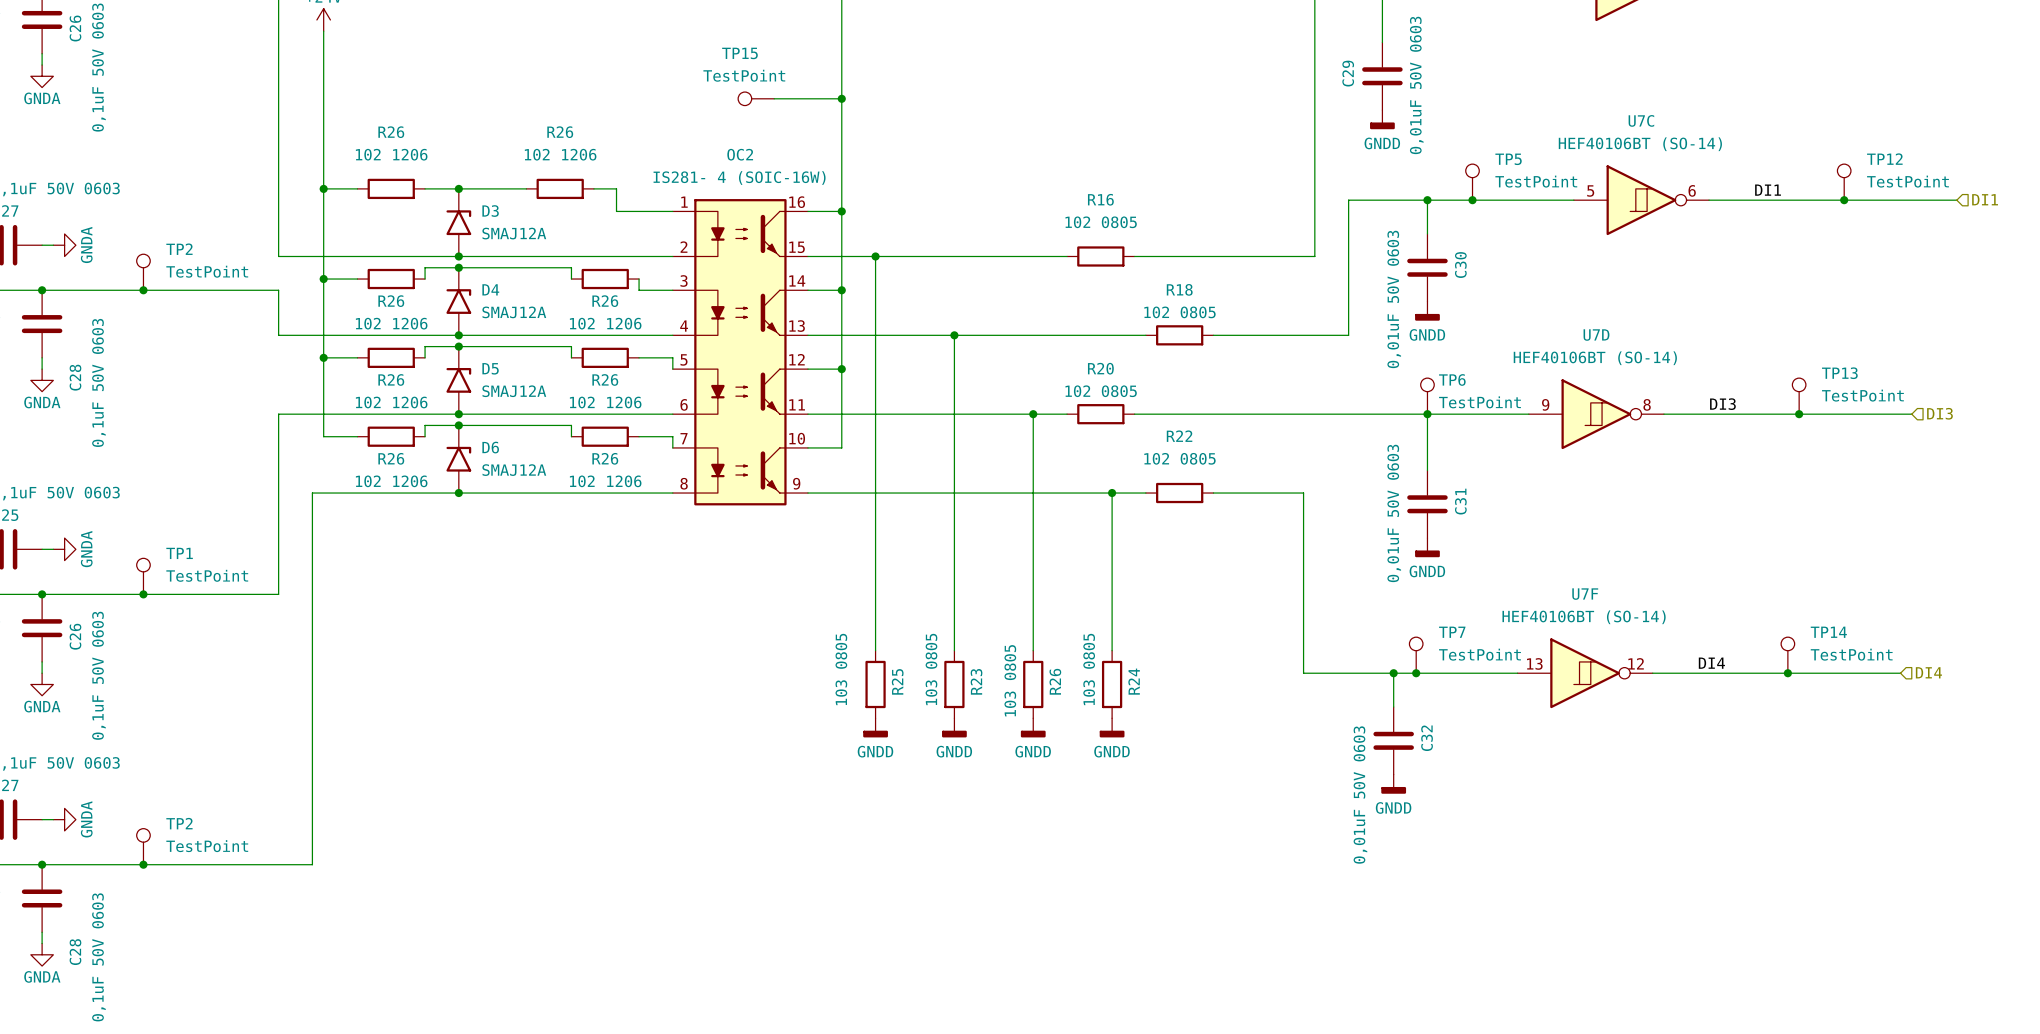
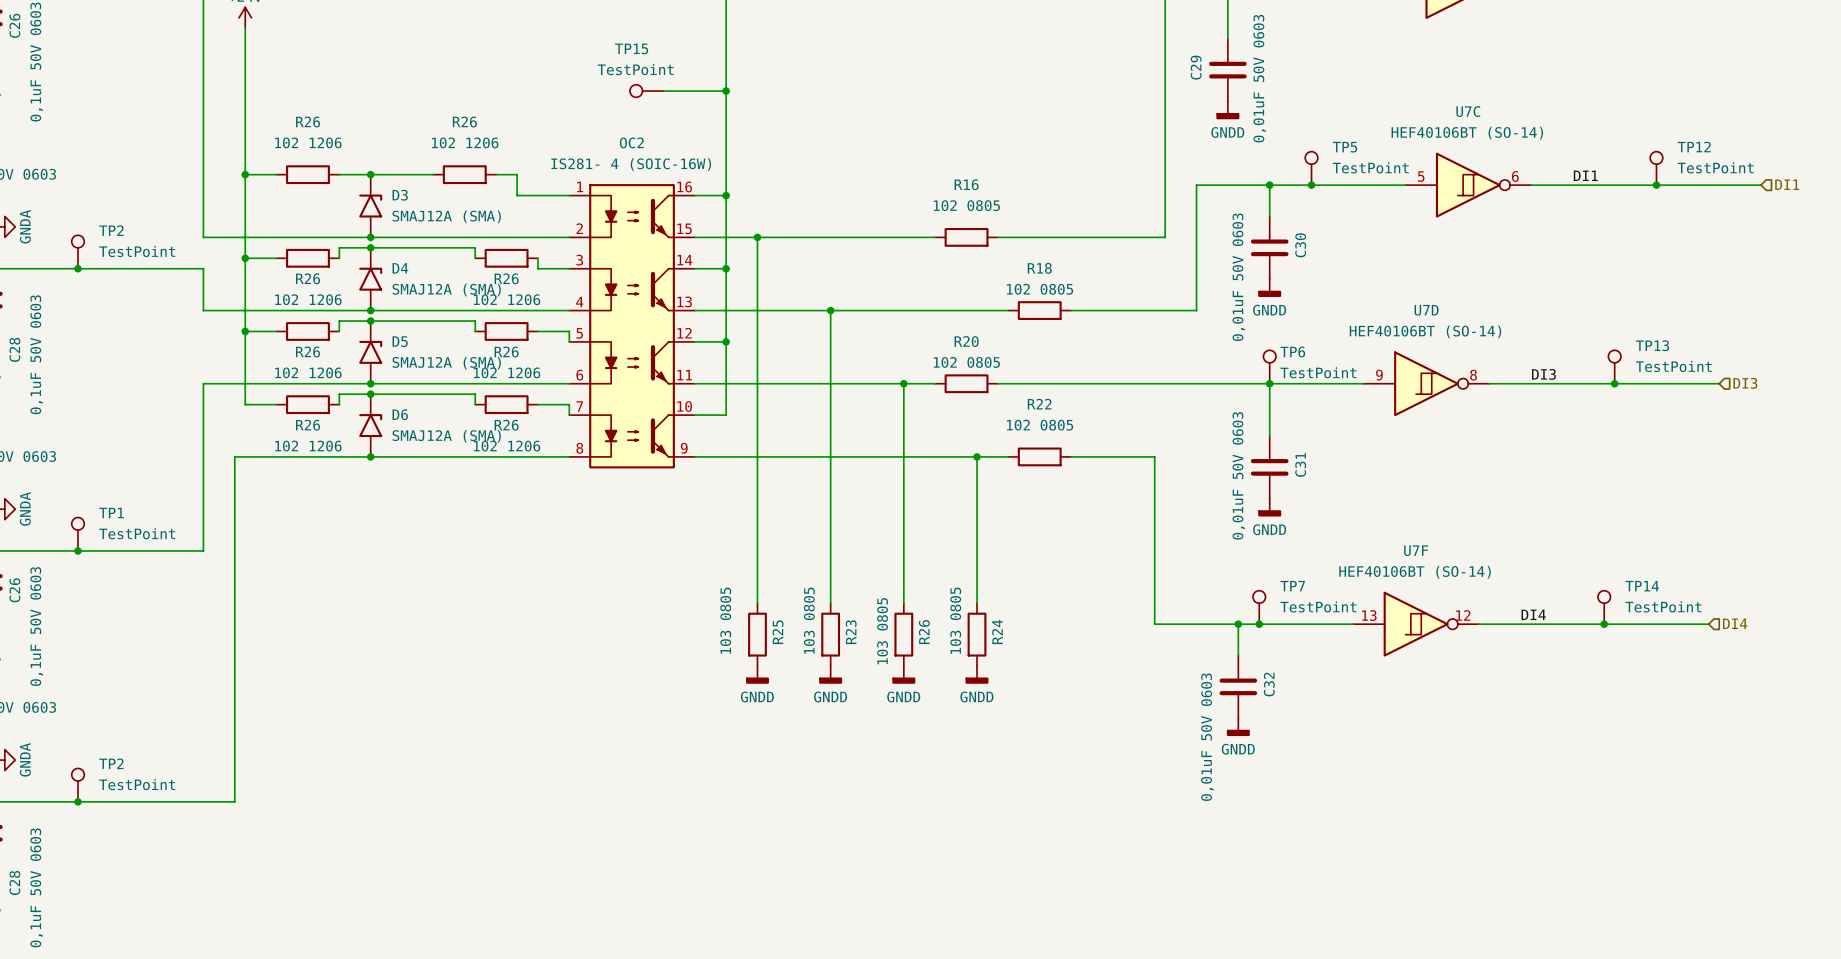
D3 value: SMAJ12A (514, 233) -> SMAJ12A (SMA) (446, 216)
D4 value: SMAJ12A (514, 312) -> SMAJ12A (SMA) (446, 290)
D5 value: SMAJ12A (514, 391) -> SMAJ12A (SMA) (446, 363)
D6 value: SMAJ12A (514, 470) -> SMAJ12A (SMA) (446, 436)

